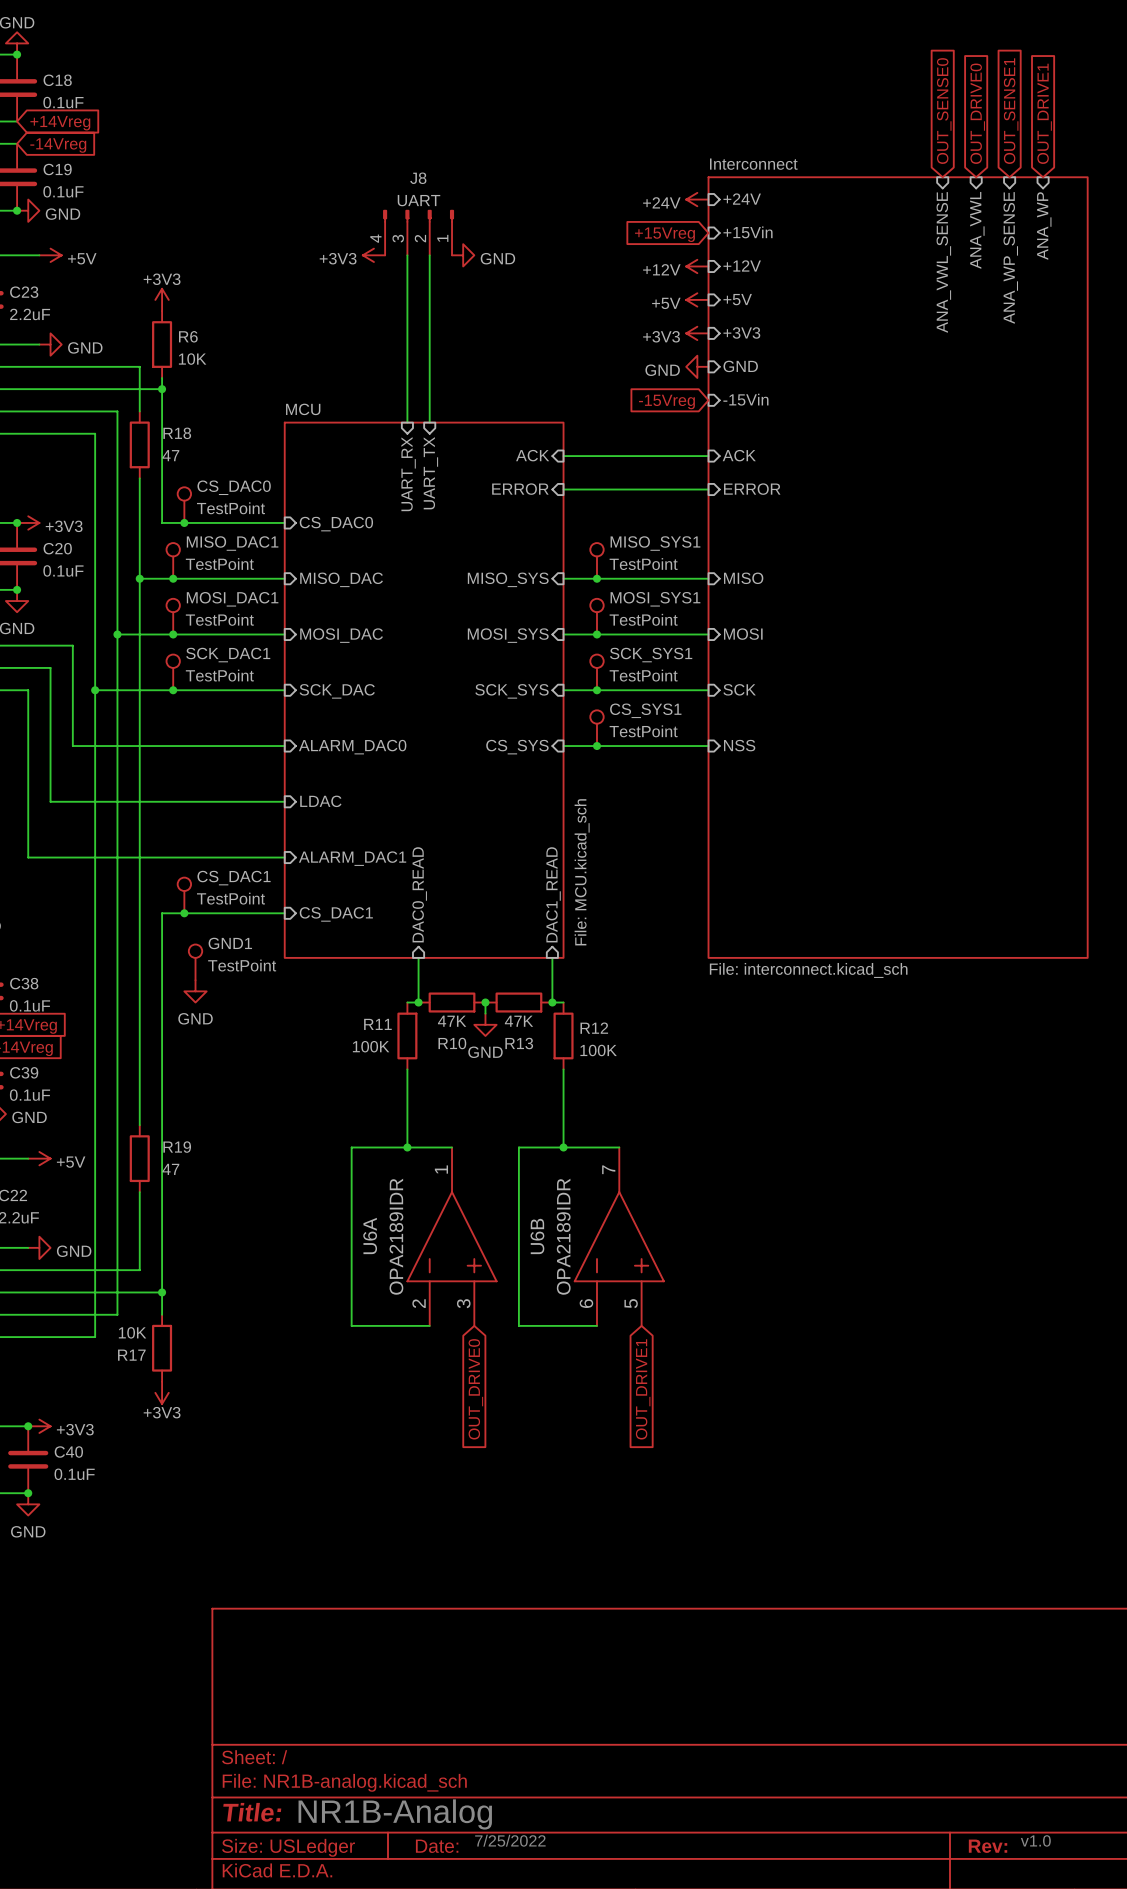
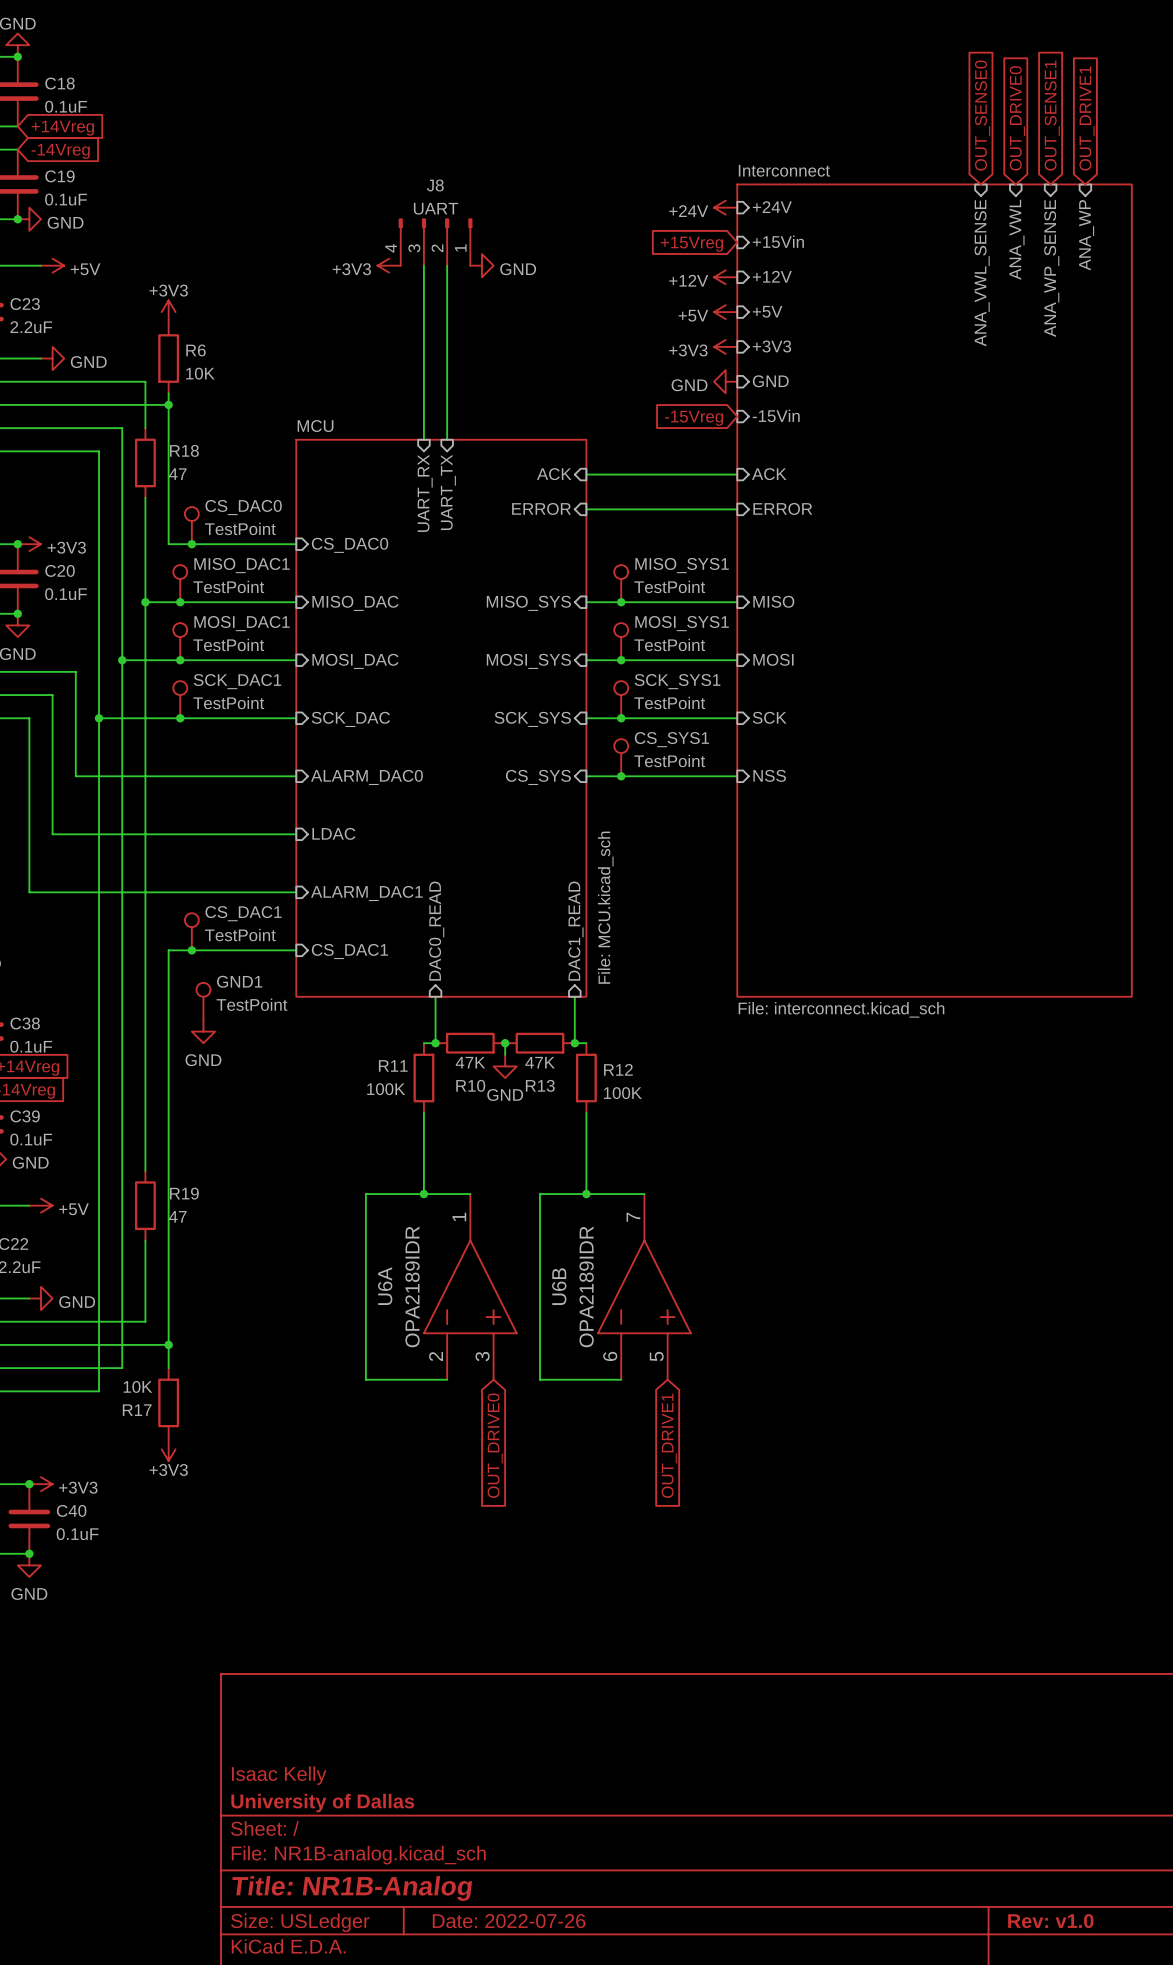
title block: none -> Isaac Kelly (279, 1775)
title block: none -> University of Dallas (322, 1803)
title block: Title: (252, 1812) -> Title: NR1B-Analog (352, 1888)
text: NR1B-Analog (395, 1814) -> none
text: 7/25/2022 (510, 1840) -> none
text: v1.0 (1035, 1840) -> none
title block: Date: (437, 1846) -> Date: 2022-07-26 (509, 1921)
title block: Rev: (988, 1846) -> Rev: v1.0 (1050, 1921)

